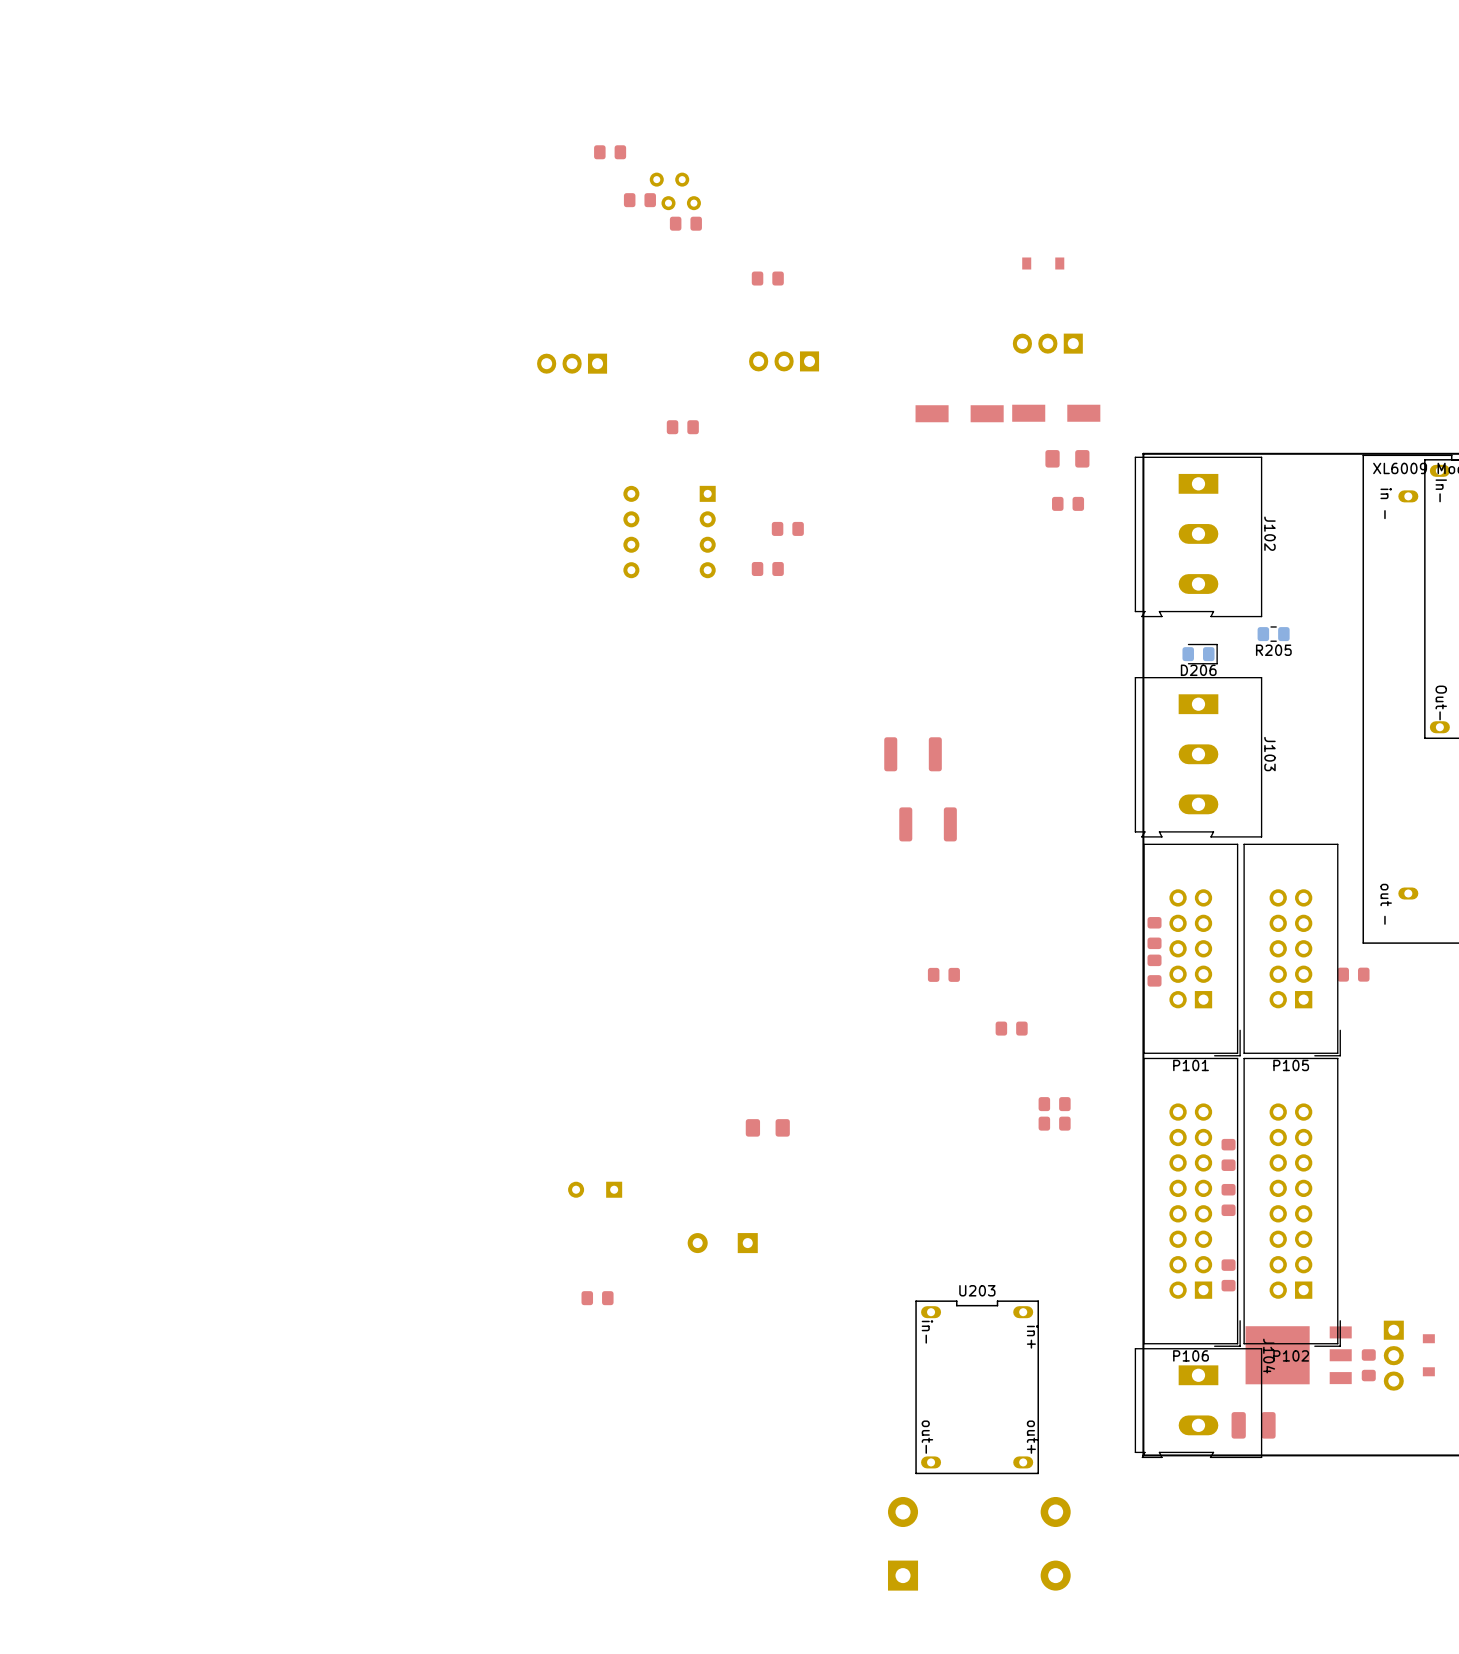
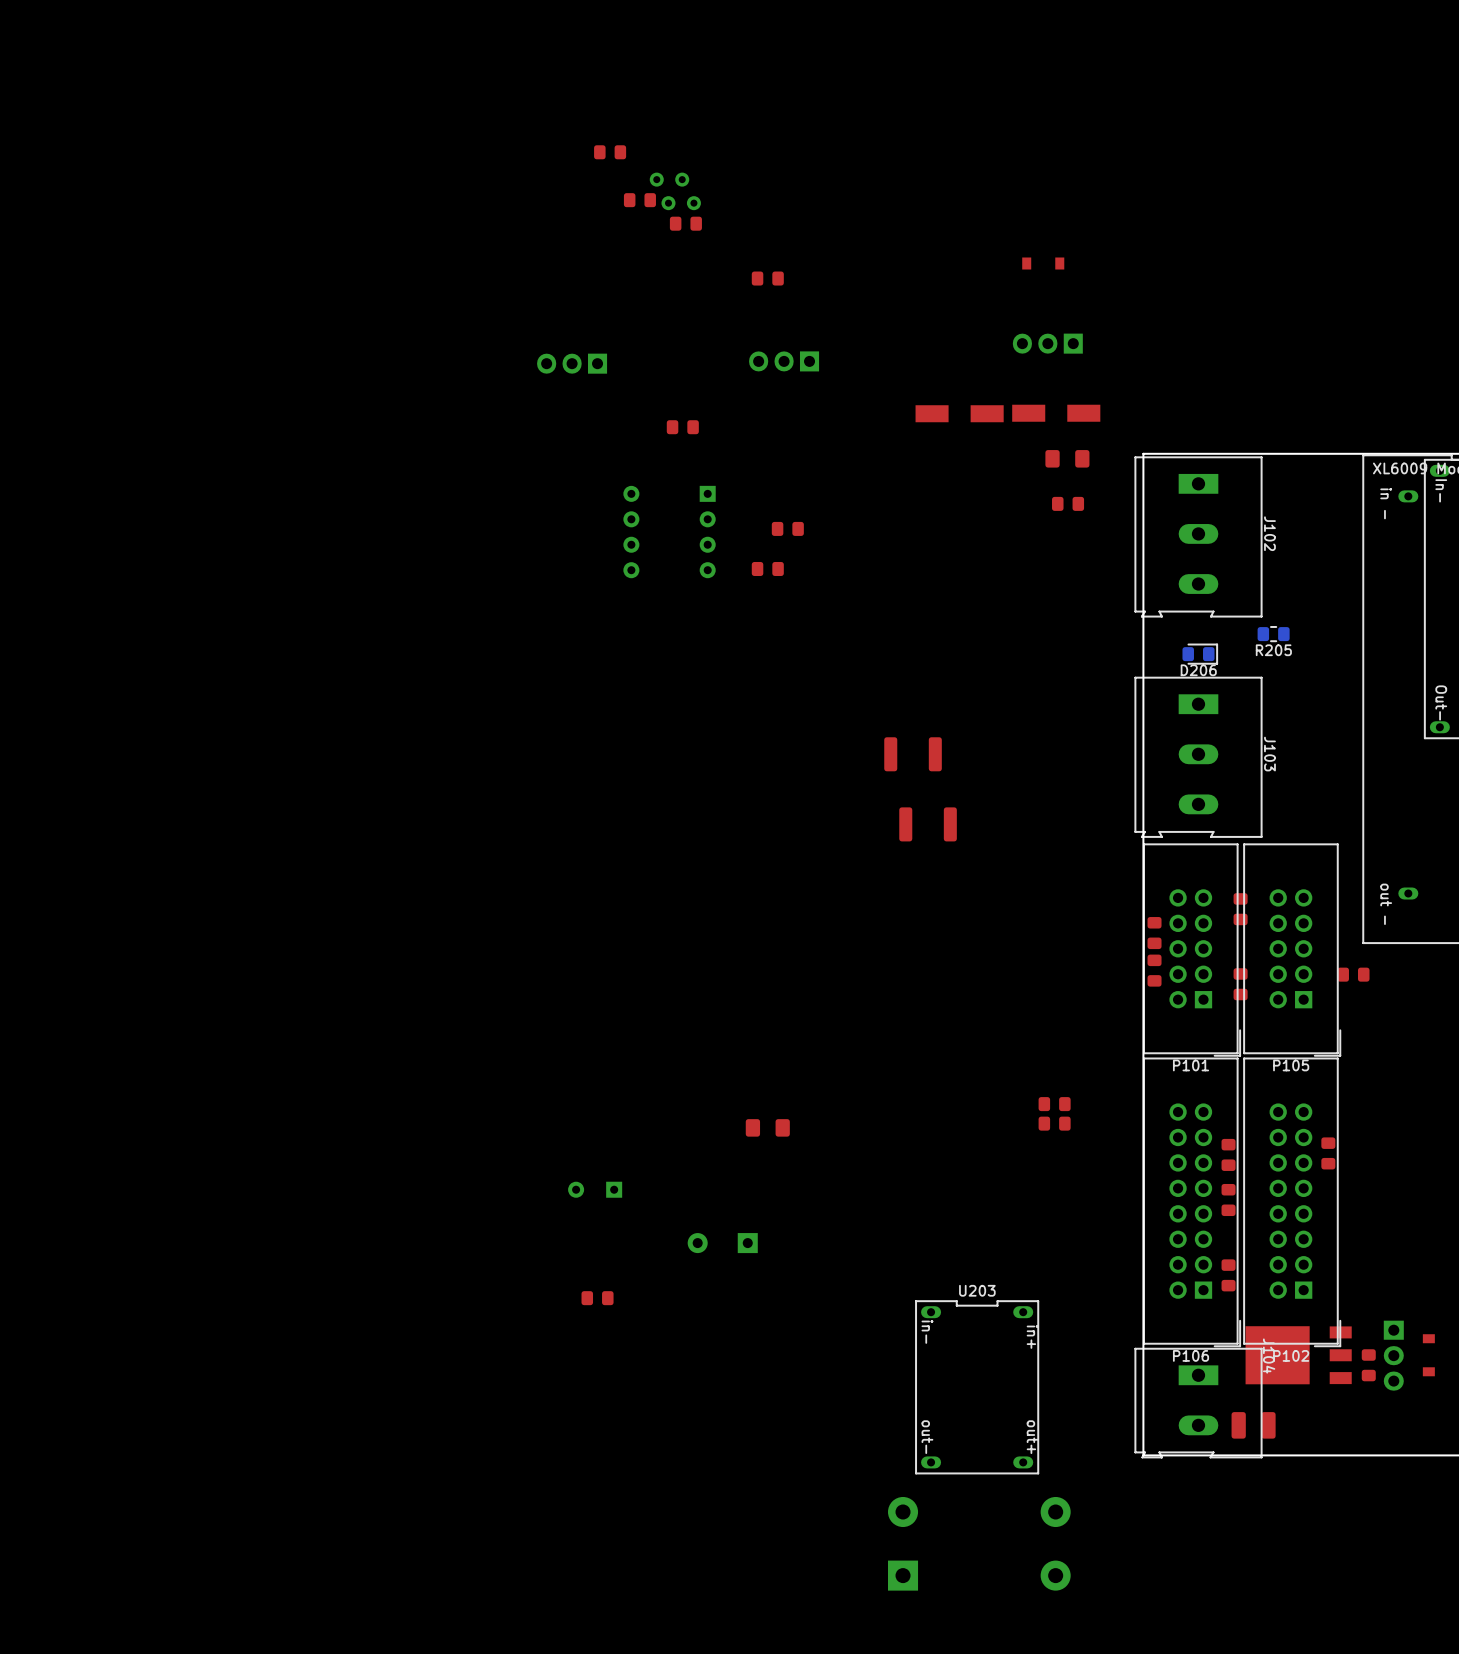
part: none -> (1240, 909)
part: (943, 974) -> none
part: none -> (1240, 984)
part: (1011, 1028) -> none
part: none -> (1328, 1153)

